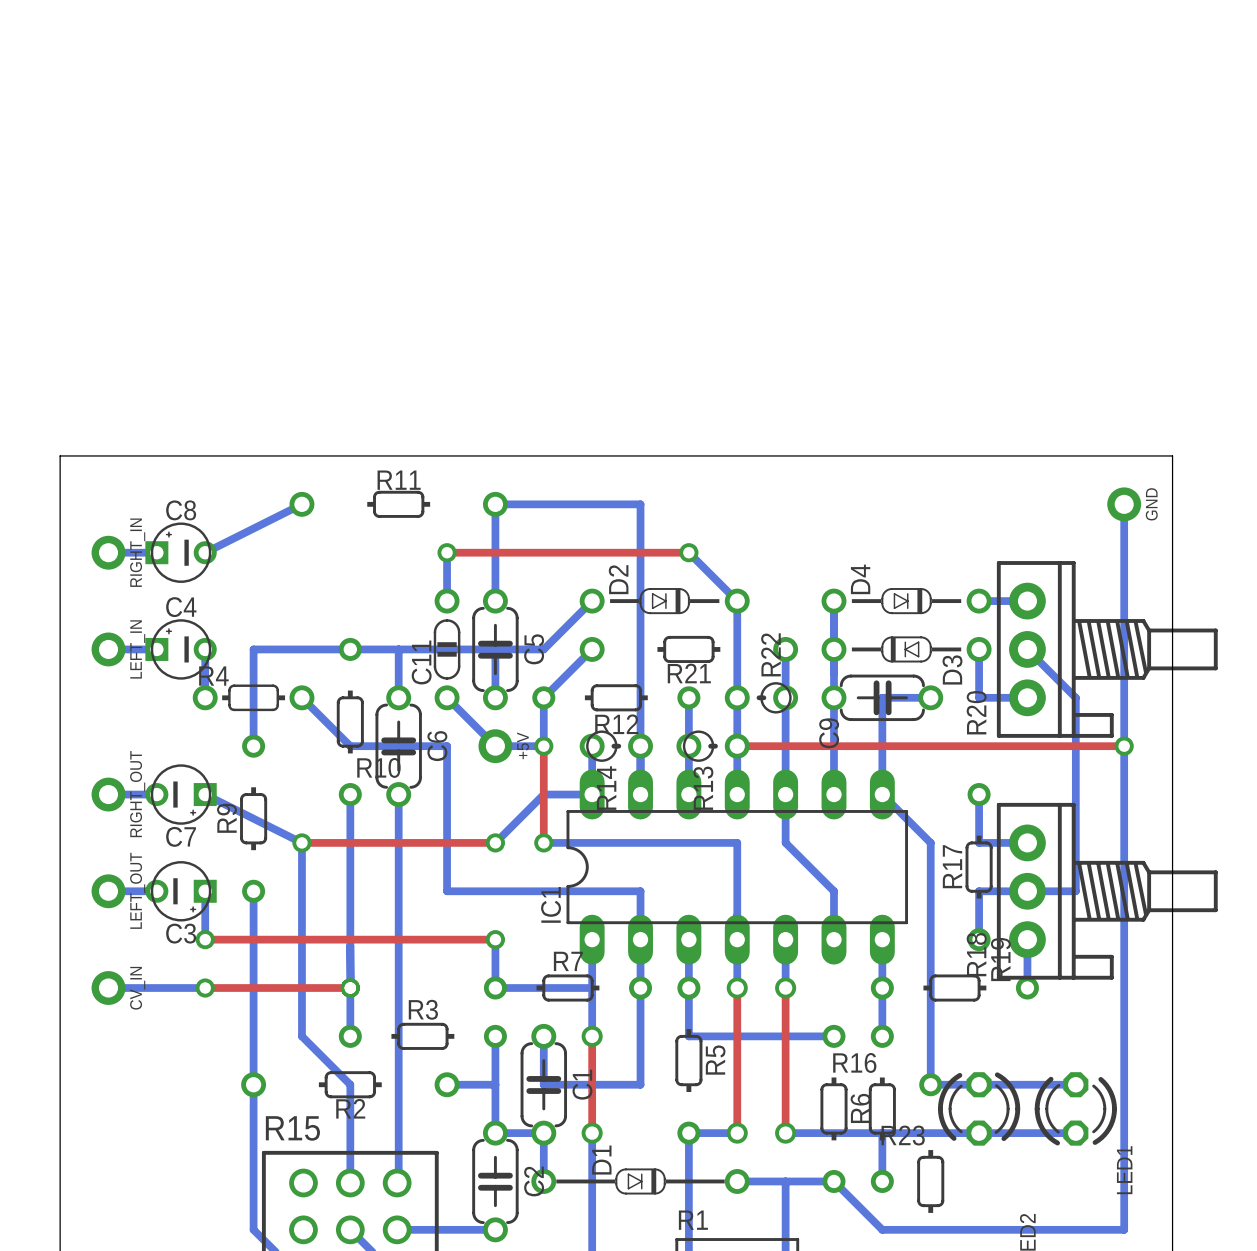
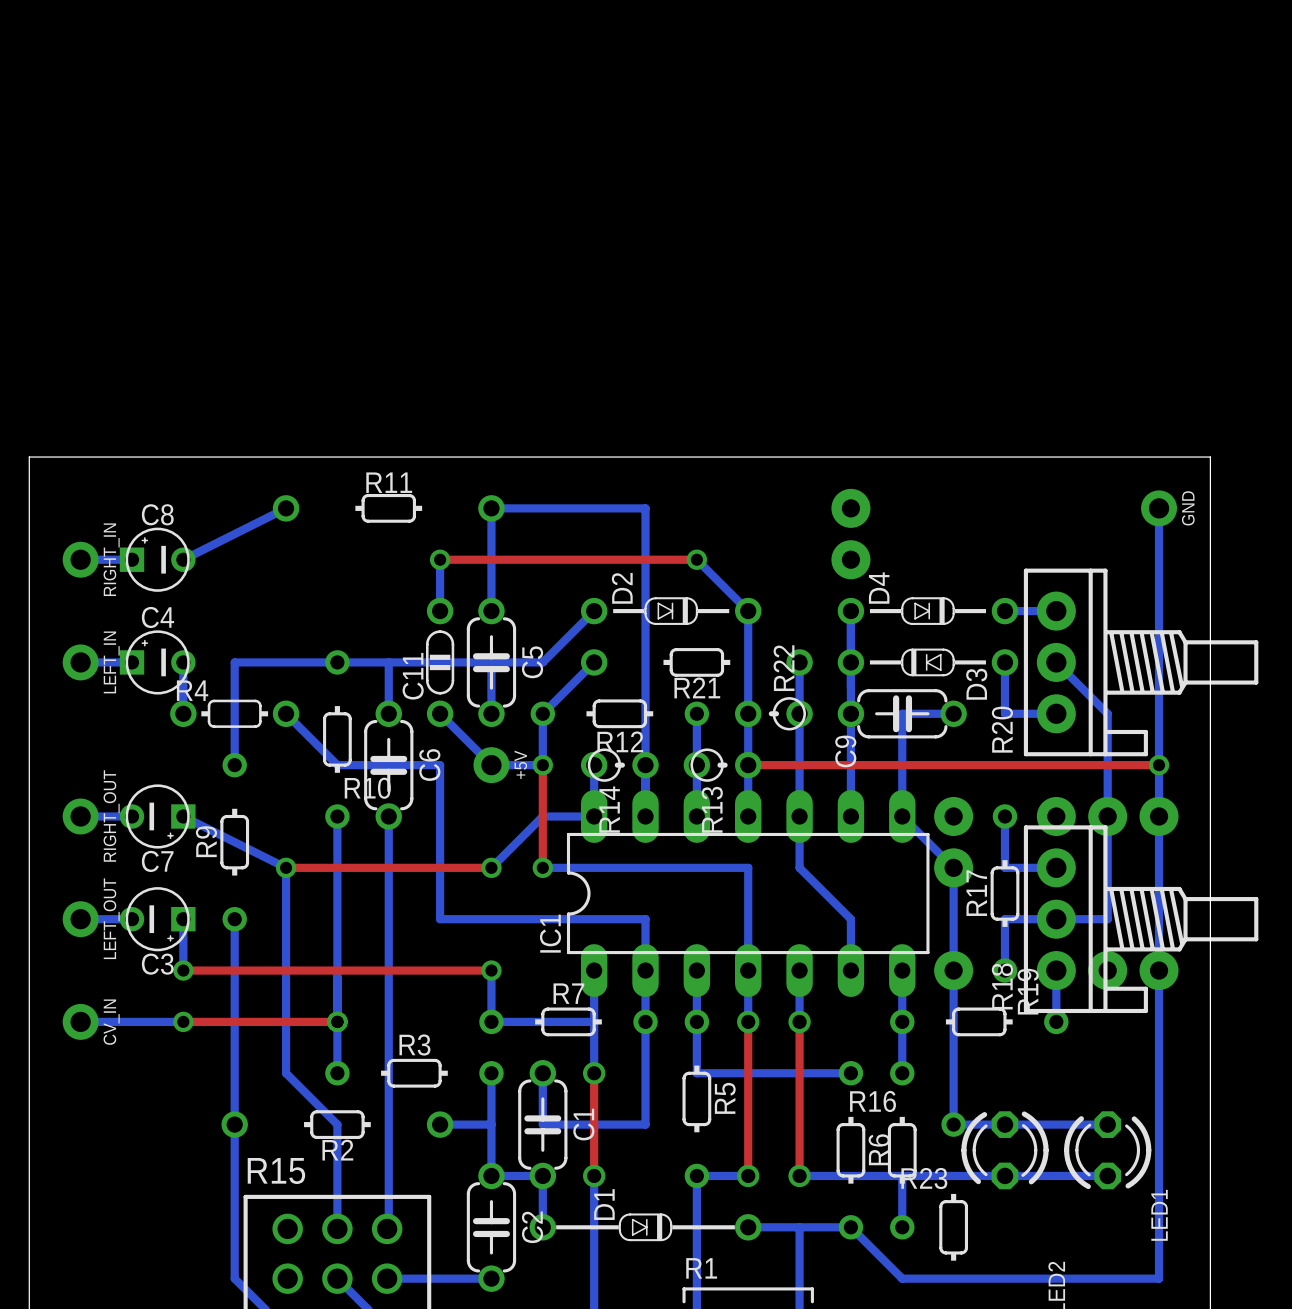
via: none -> (850, 508)
via: none -> (850, 559)
via: none -> (953, 816)
via: none -> (1056, 816)
via: none -> (1107, 816)
via: none -> (1159, 816)
via: none -> (953, 867)
via: none -> (953, 970)
via: none -> (1107, 970)
via: none -> (1159, 970)

